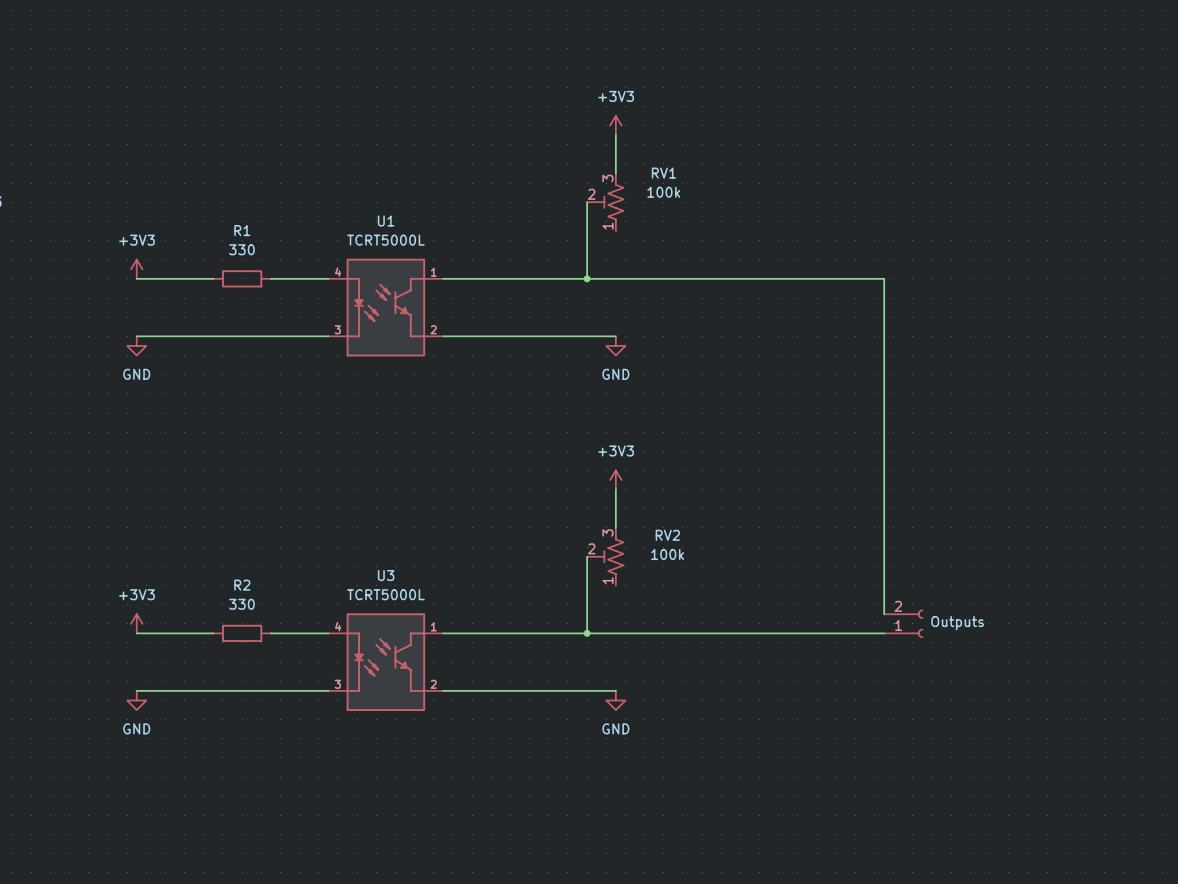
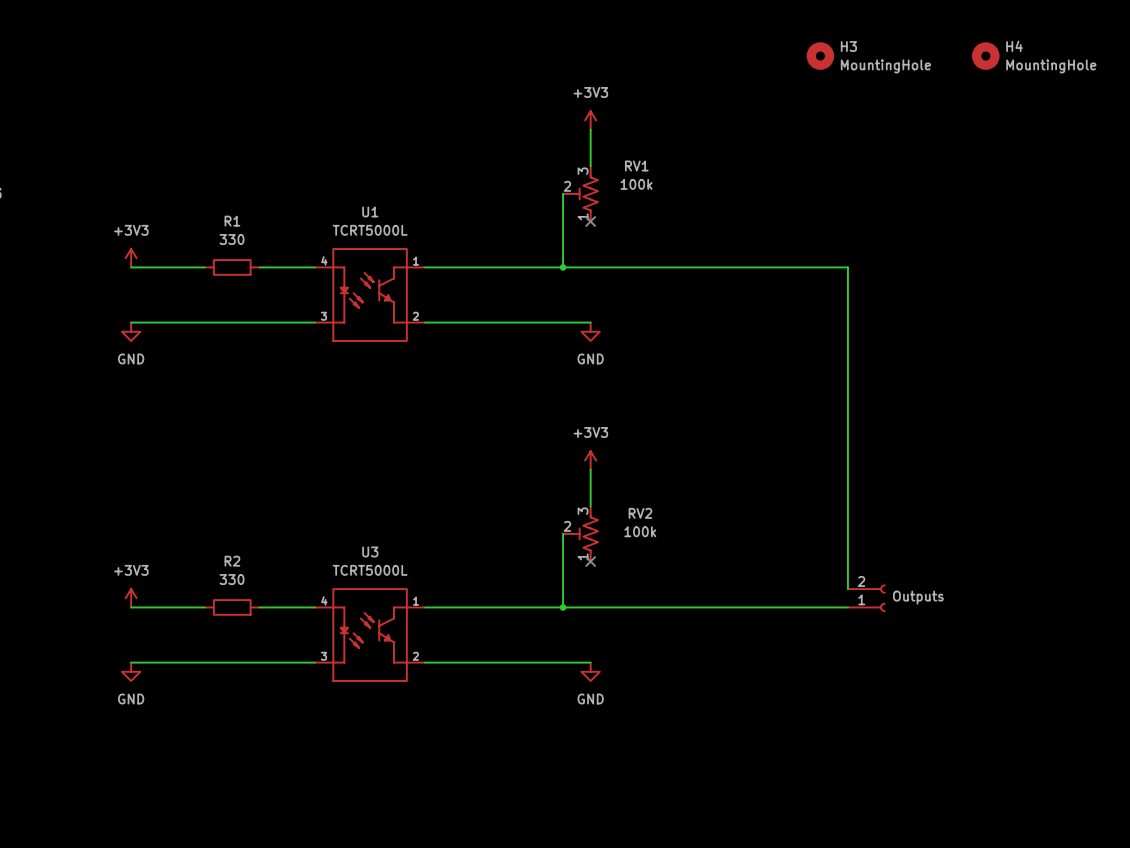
H3: none -> MountingHole (820, 56)
H4: none -> MountingHole (985, 56)
no-connect mark: none -> (590, 221)
no-connect mark: none -> (590, 561)

